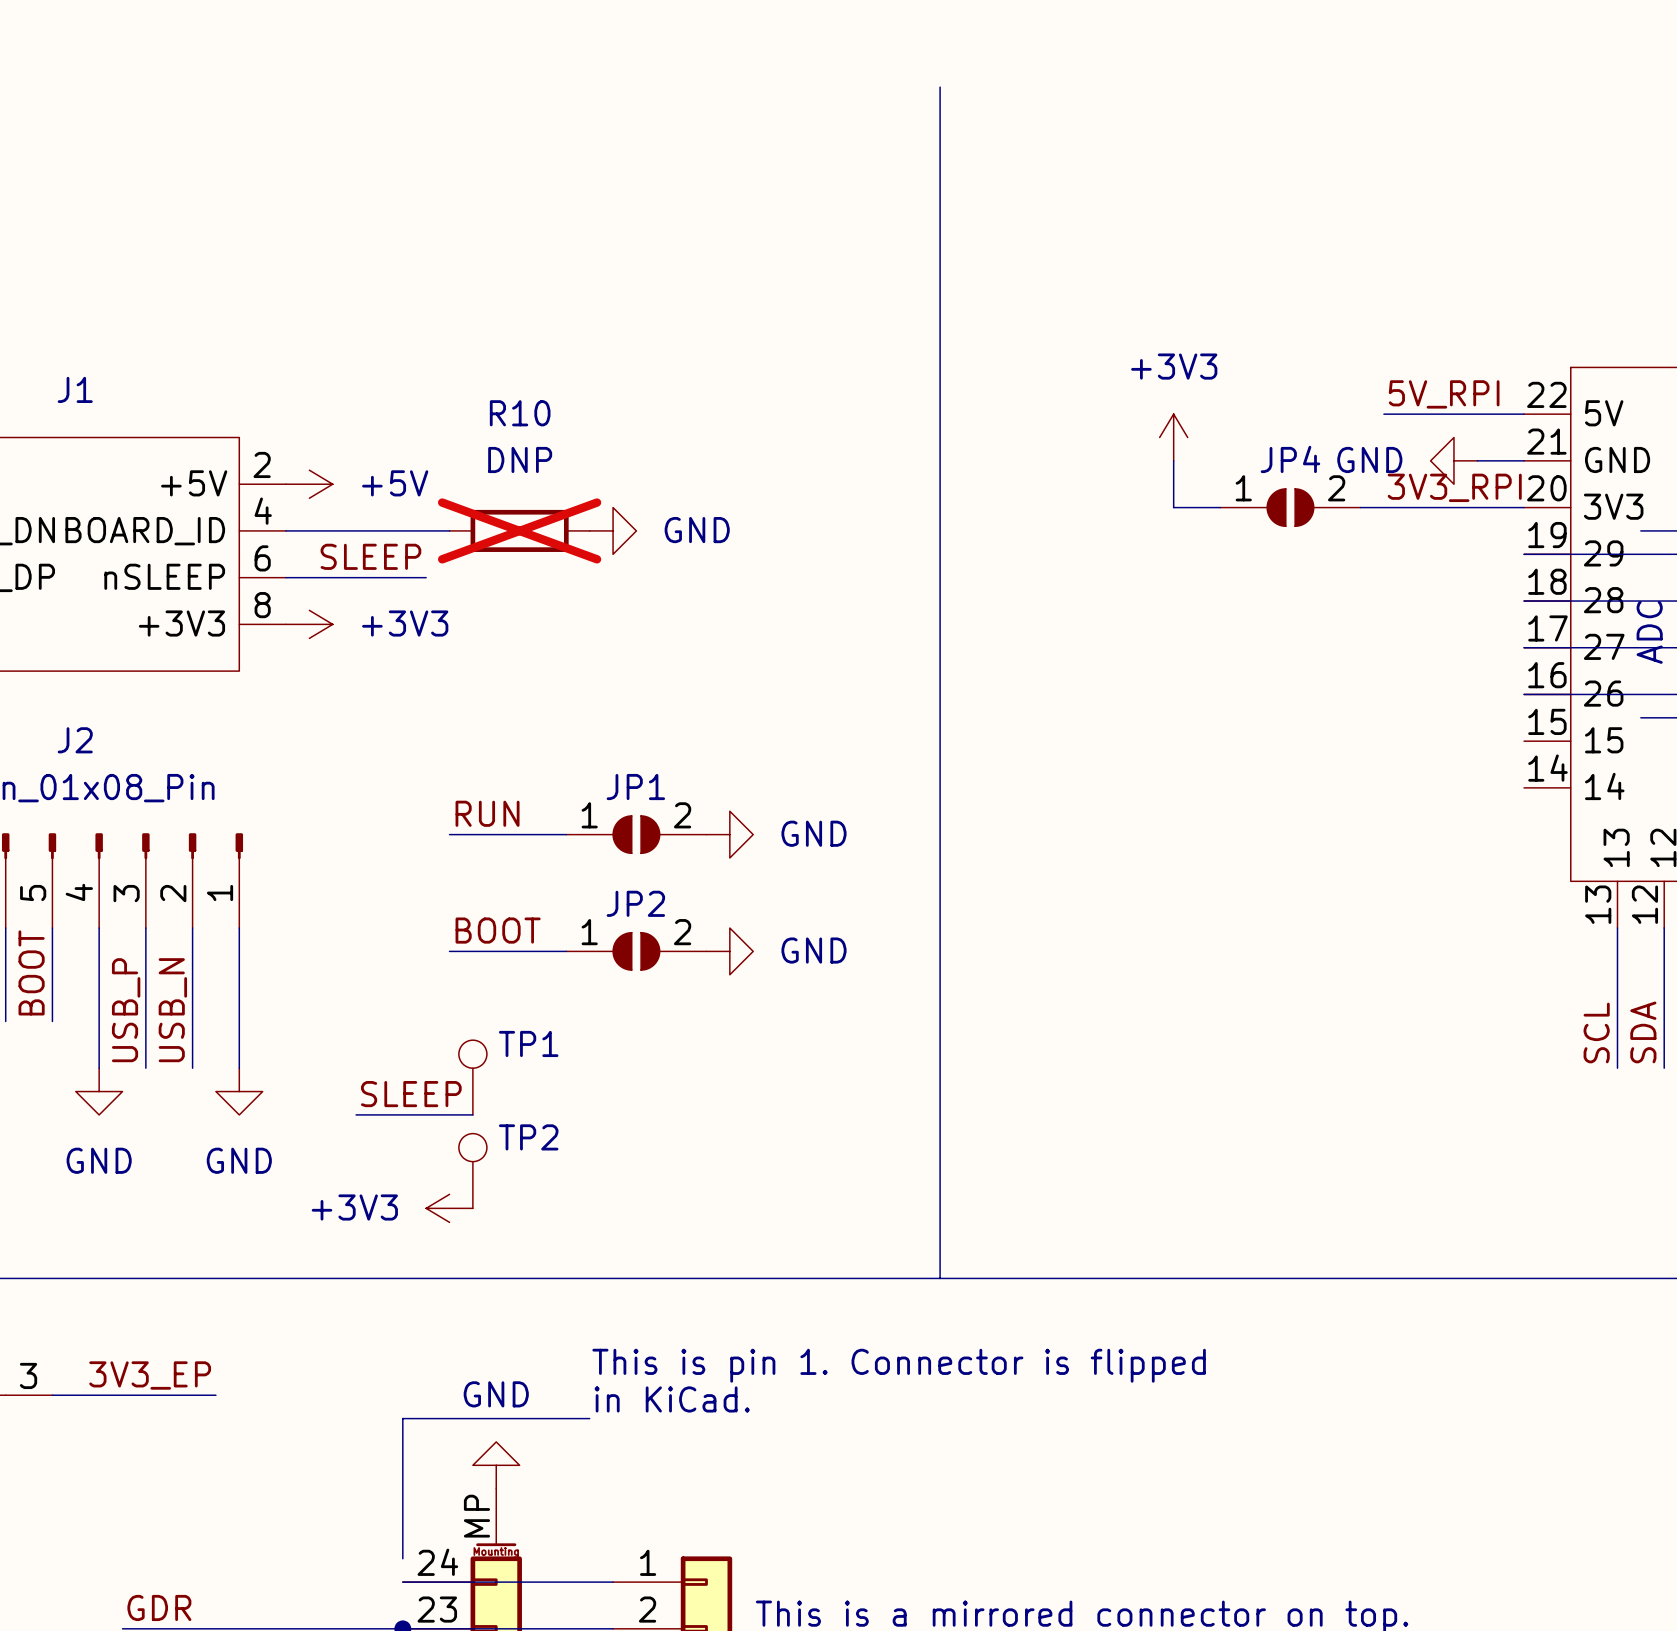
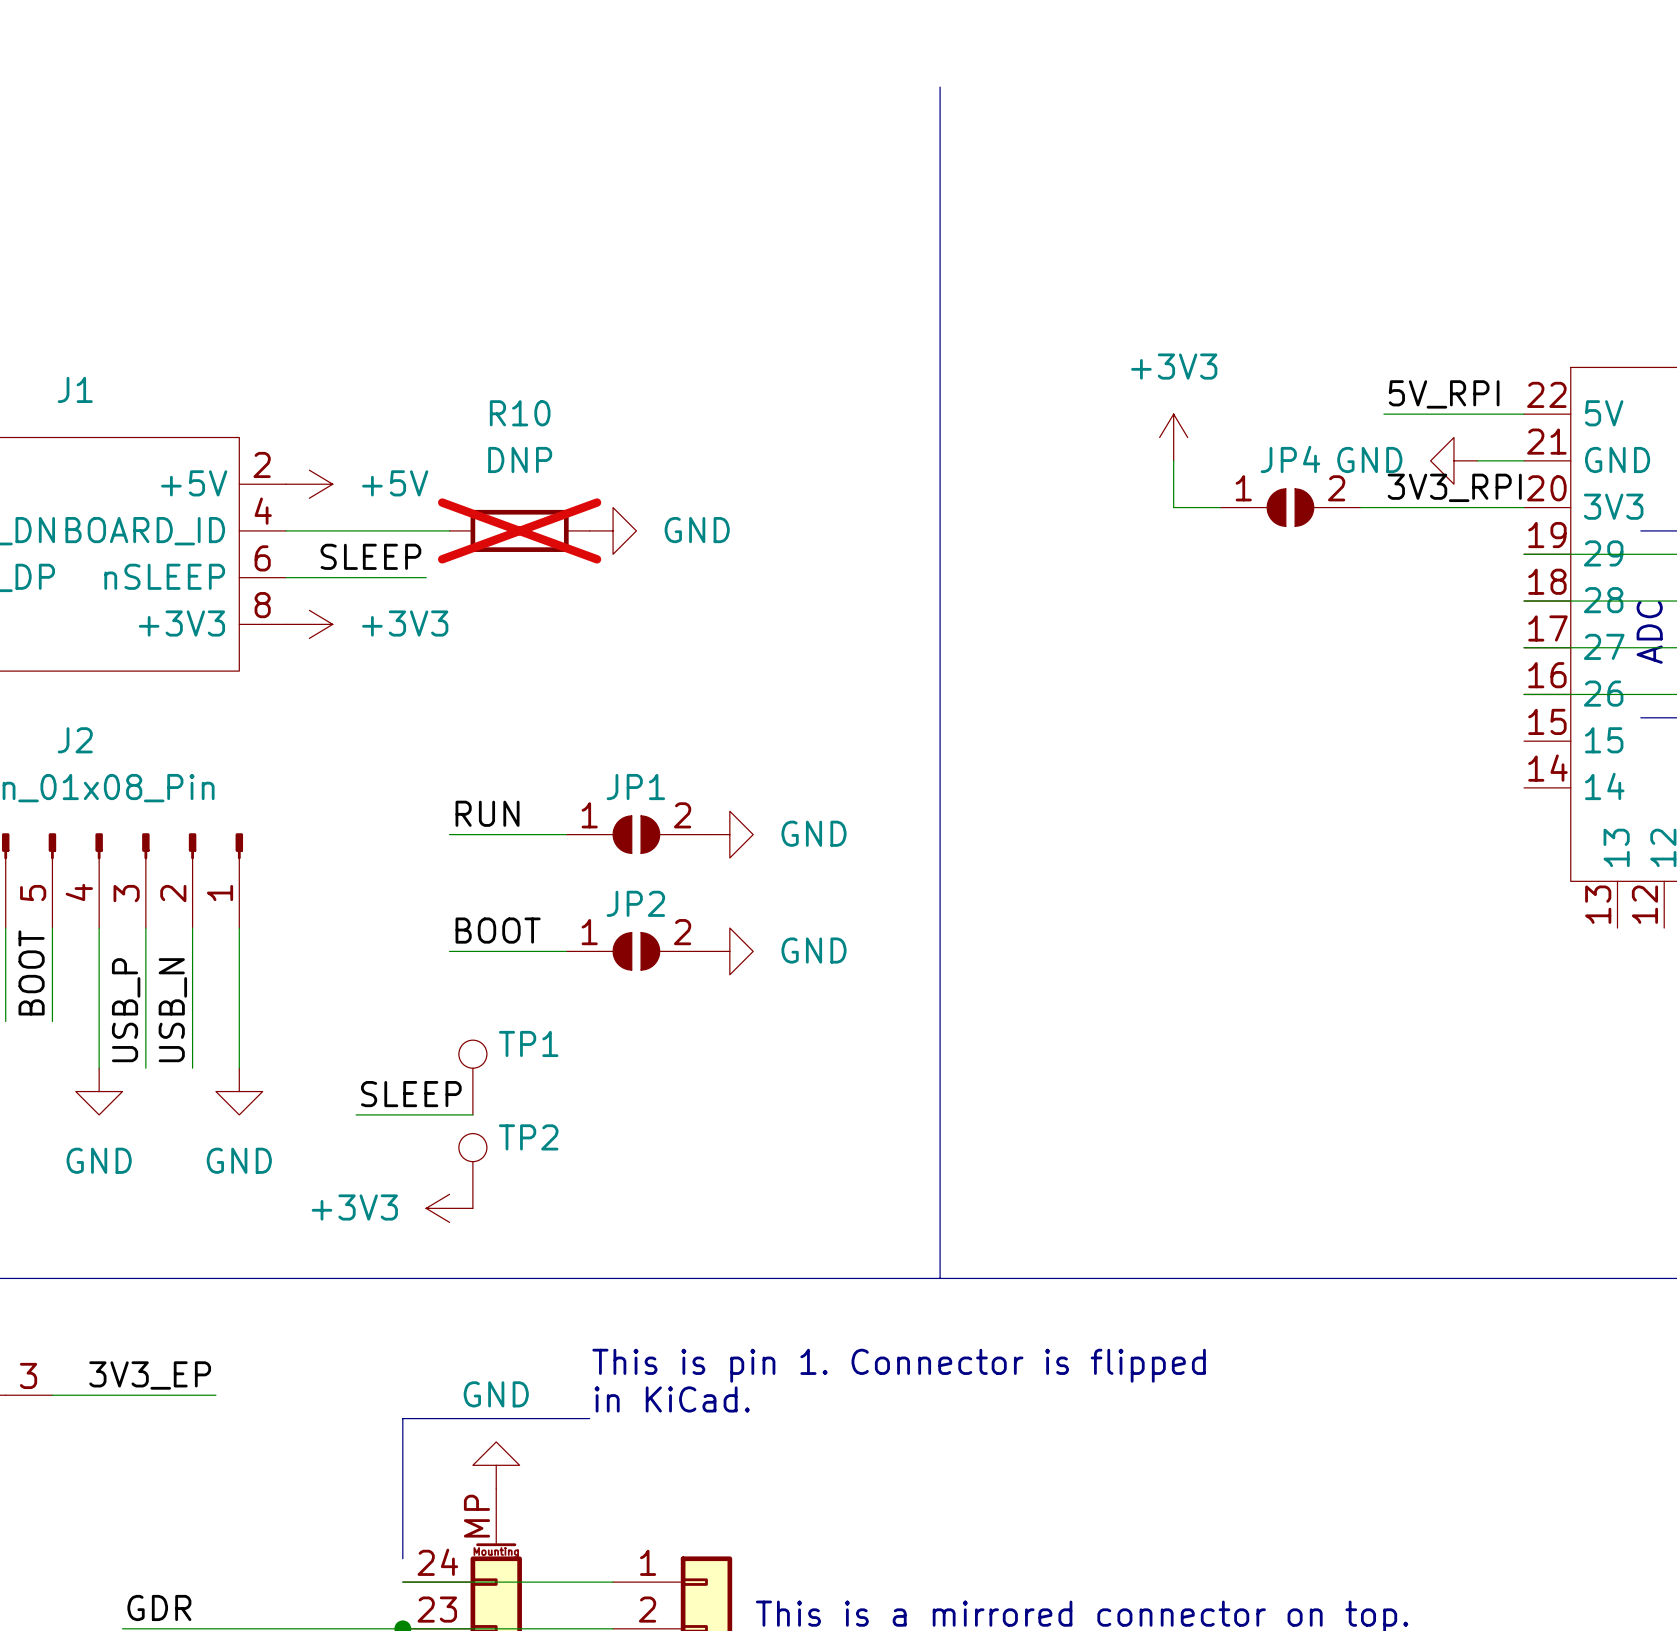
wire: (1617, 928) (1617, 1068) -> none
wire: (1664, 928) (1664, 1068) -> none
label: SCL (1596, 1032) -> none
label: SDA (1643, 1032) -> none

